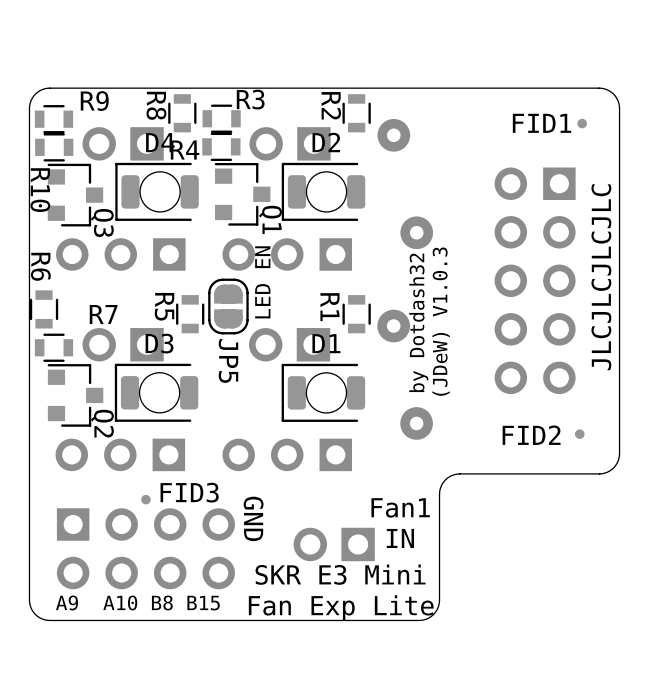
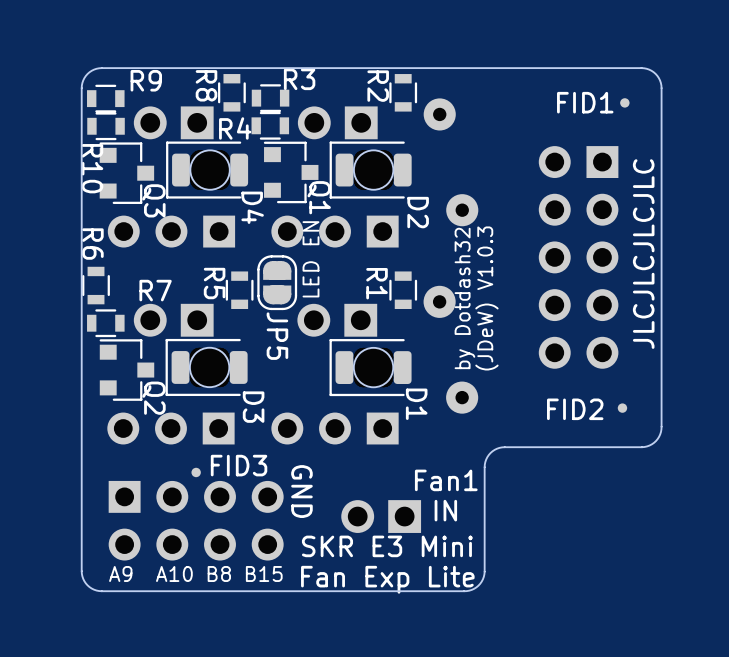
D4 name rotation: 0° (160, 142) -> 90° clockwise (252, 207)
D4 name position: D4 (160, 142) -> D4 (252, 207)
D2 name rotation: 0° (326, 142) -> 90° clockwise (418, 212)
D2 name position: D2 (326, 142) -> D2 (418, 212)
D3 name rotation: 0° (159, 343) -> 90° clockwise (253, 407)
D3 name position: D3 (159, 343) -> D3 (253, 407)
D1 name rotation: 0° (326, 343) -> 90° clockwise (416, 404)
D1 name position: D1 (326, 343) -> D1 (416, 404)

